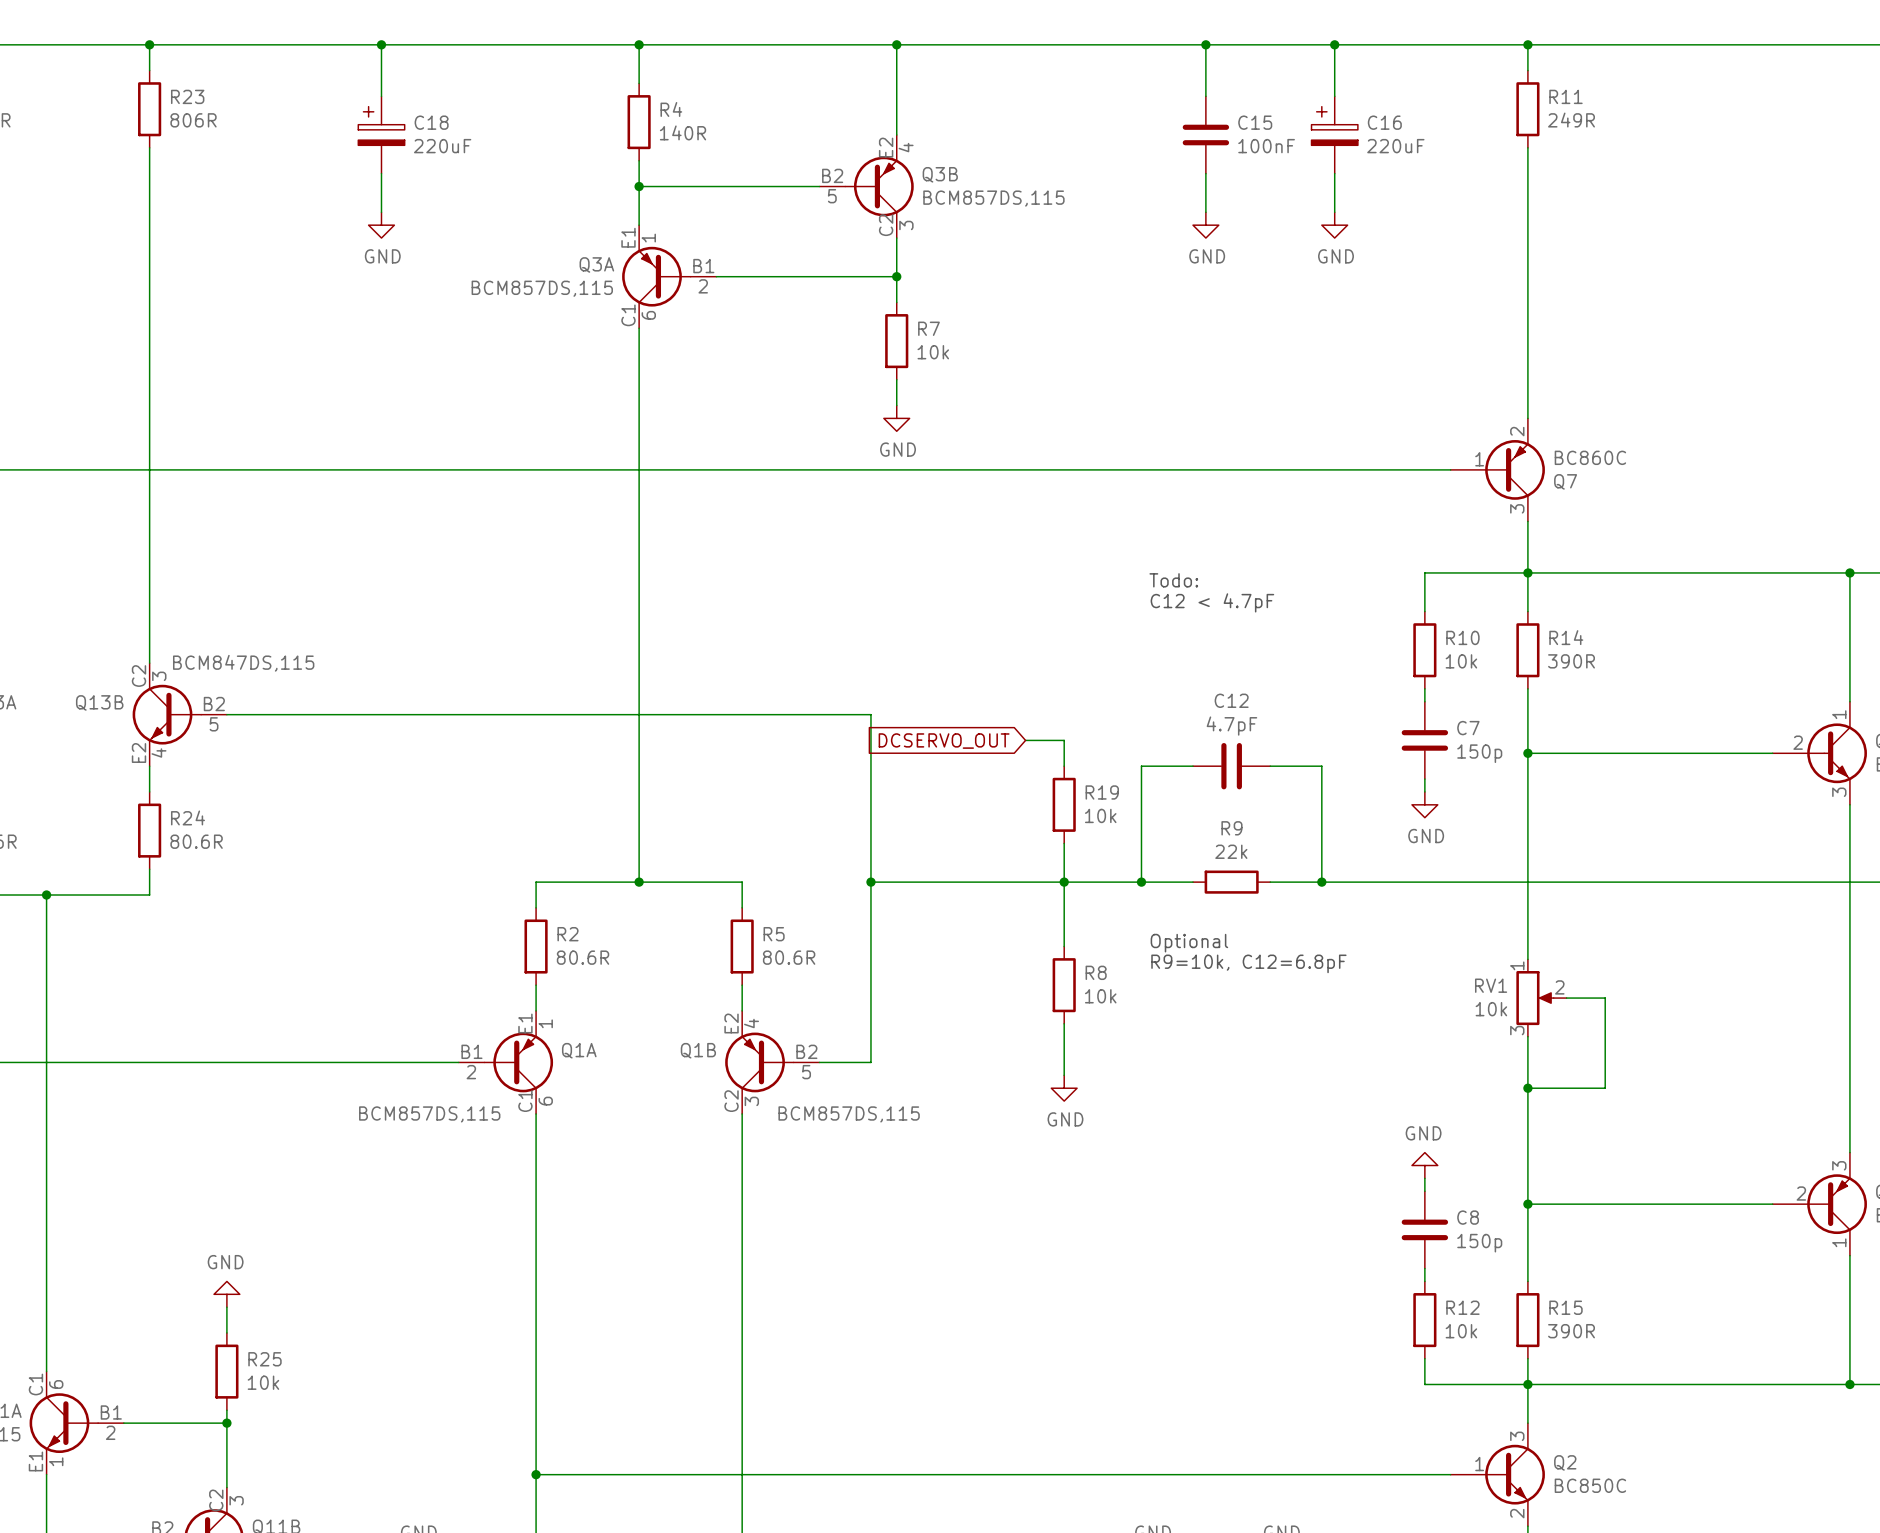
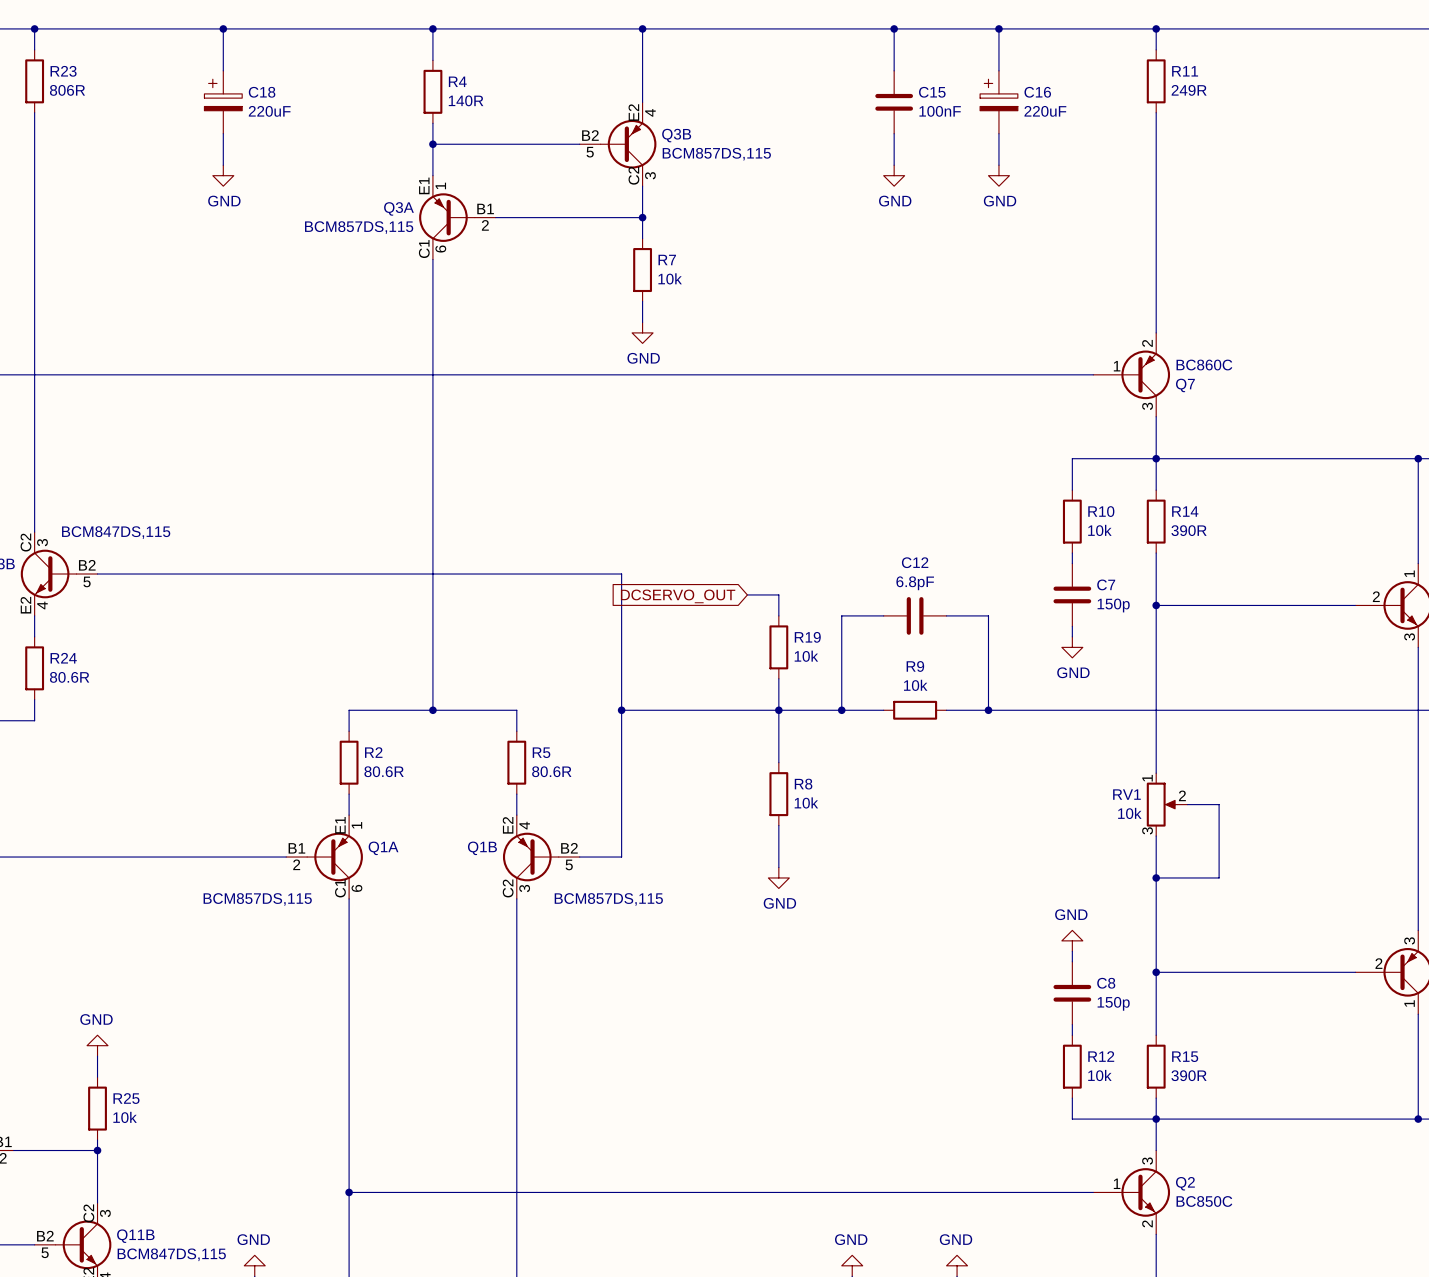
text: Todo: (1173, 580) -> none
text: C12 < 4.7pF (1212, 602) -> none
C12 value: 4.7pF (1231, 726) -> 6.8pF (915, 583)
R9 value: 22k (1231, 851) -> 10k (915, 685)
text: Optional (1189, 943) -> none
text: R9=10k, C12=6.8pF (1248, 963) -> none

